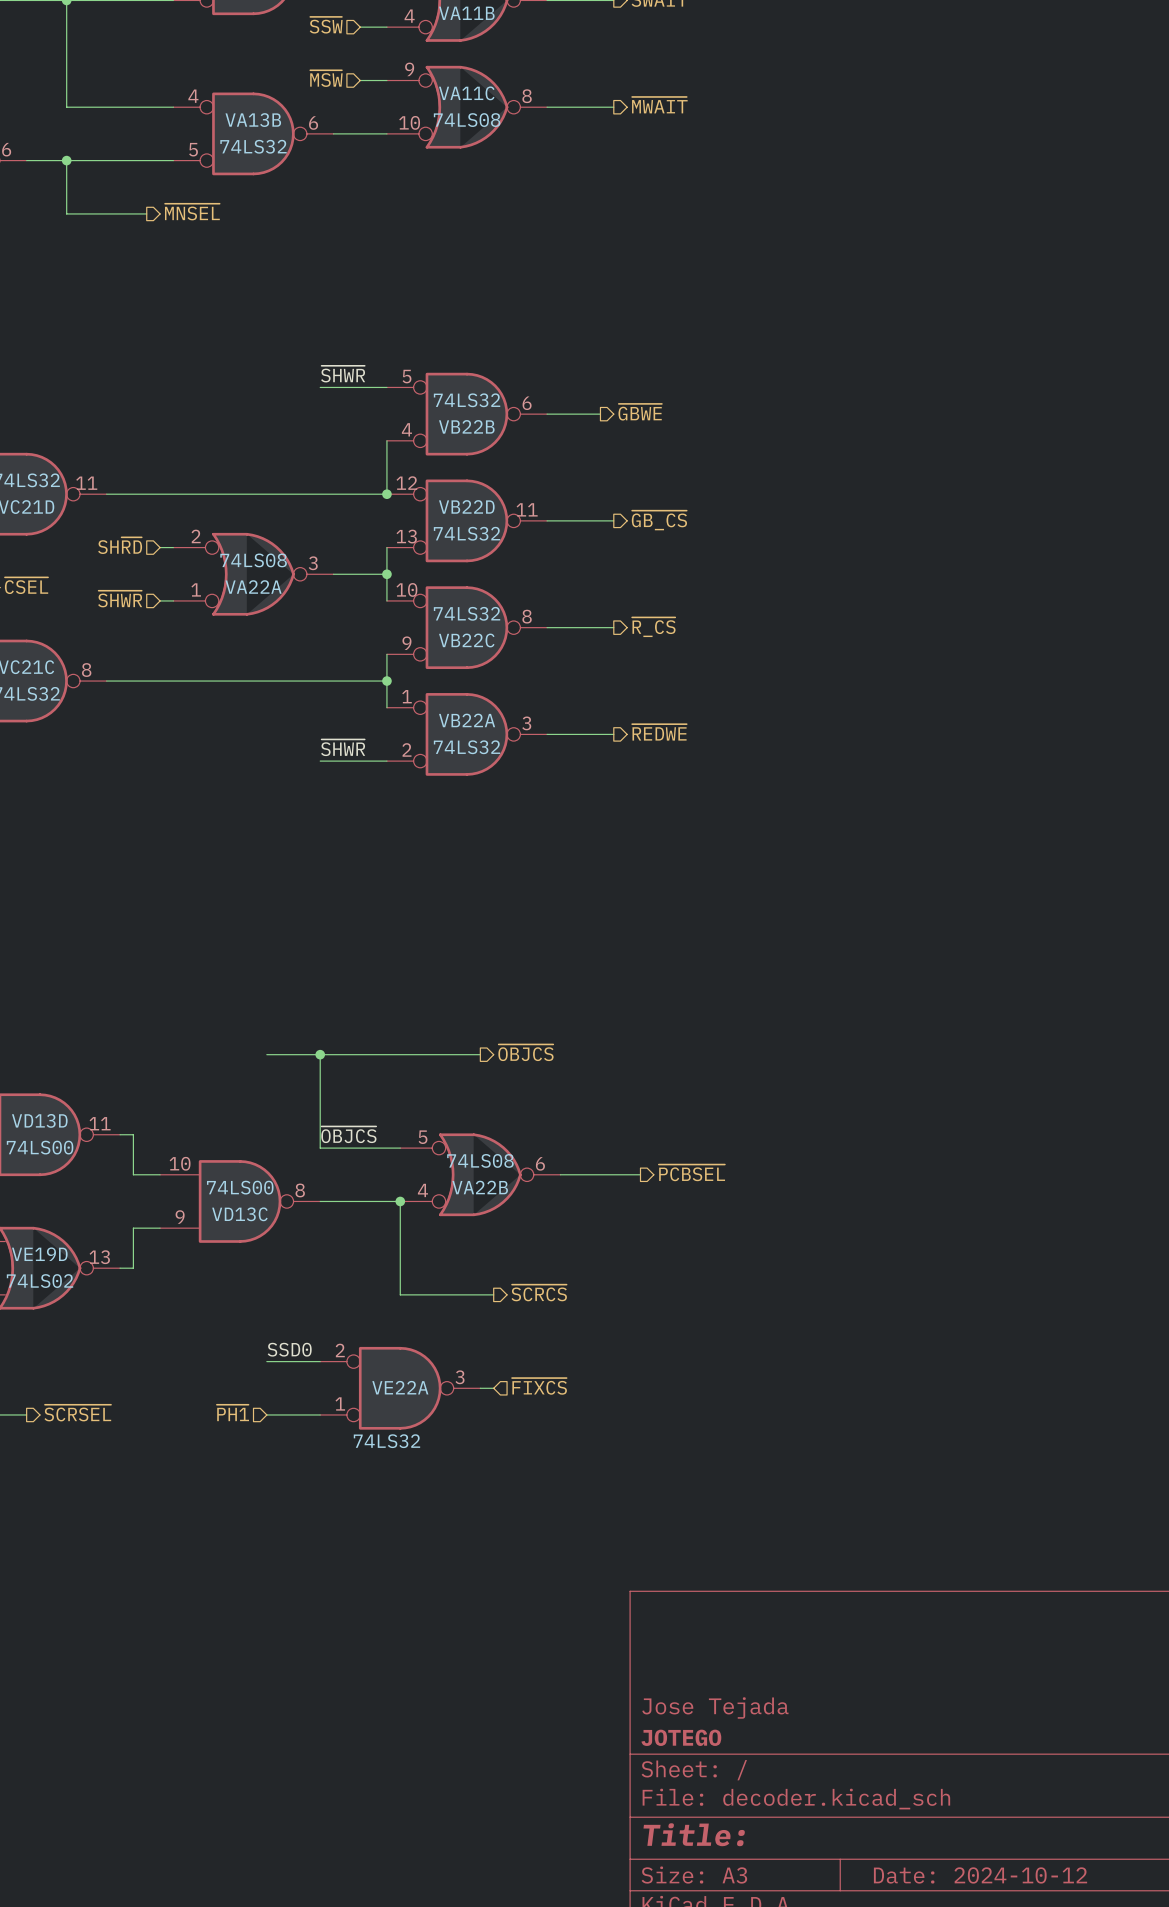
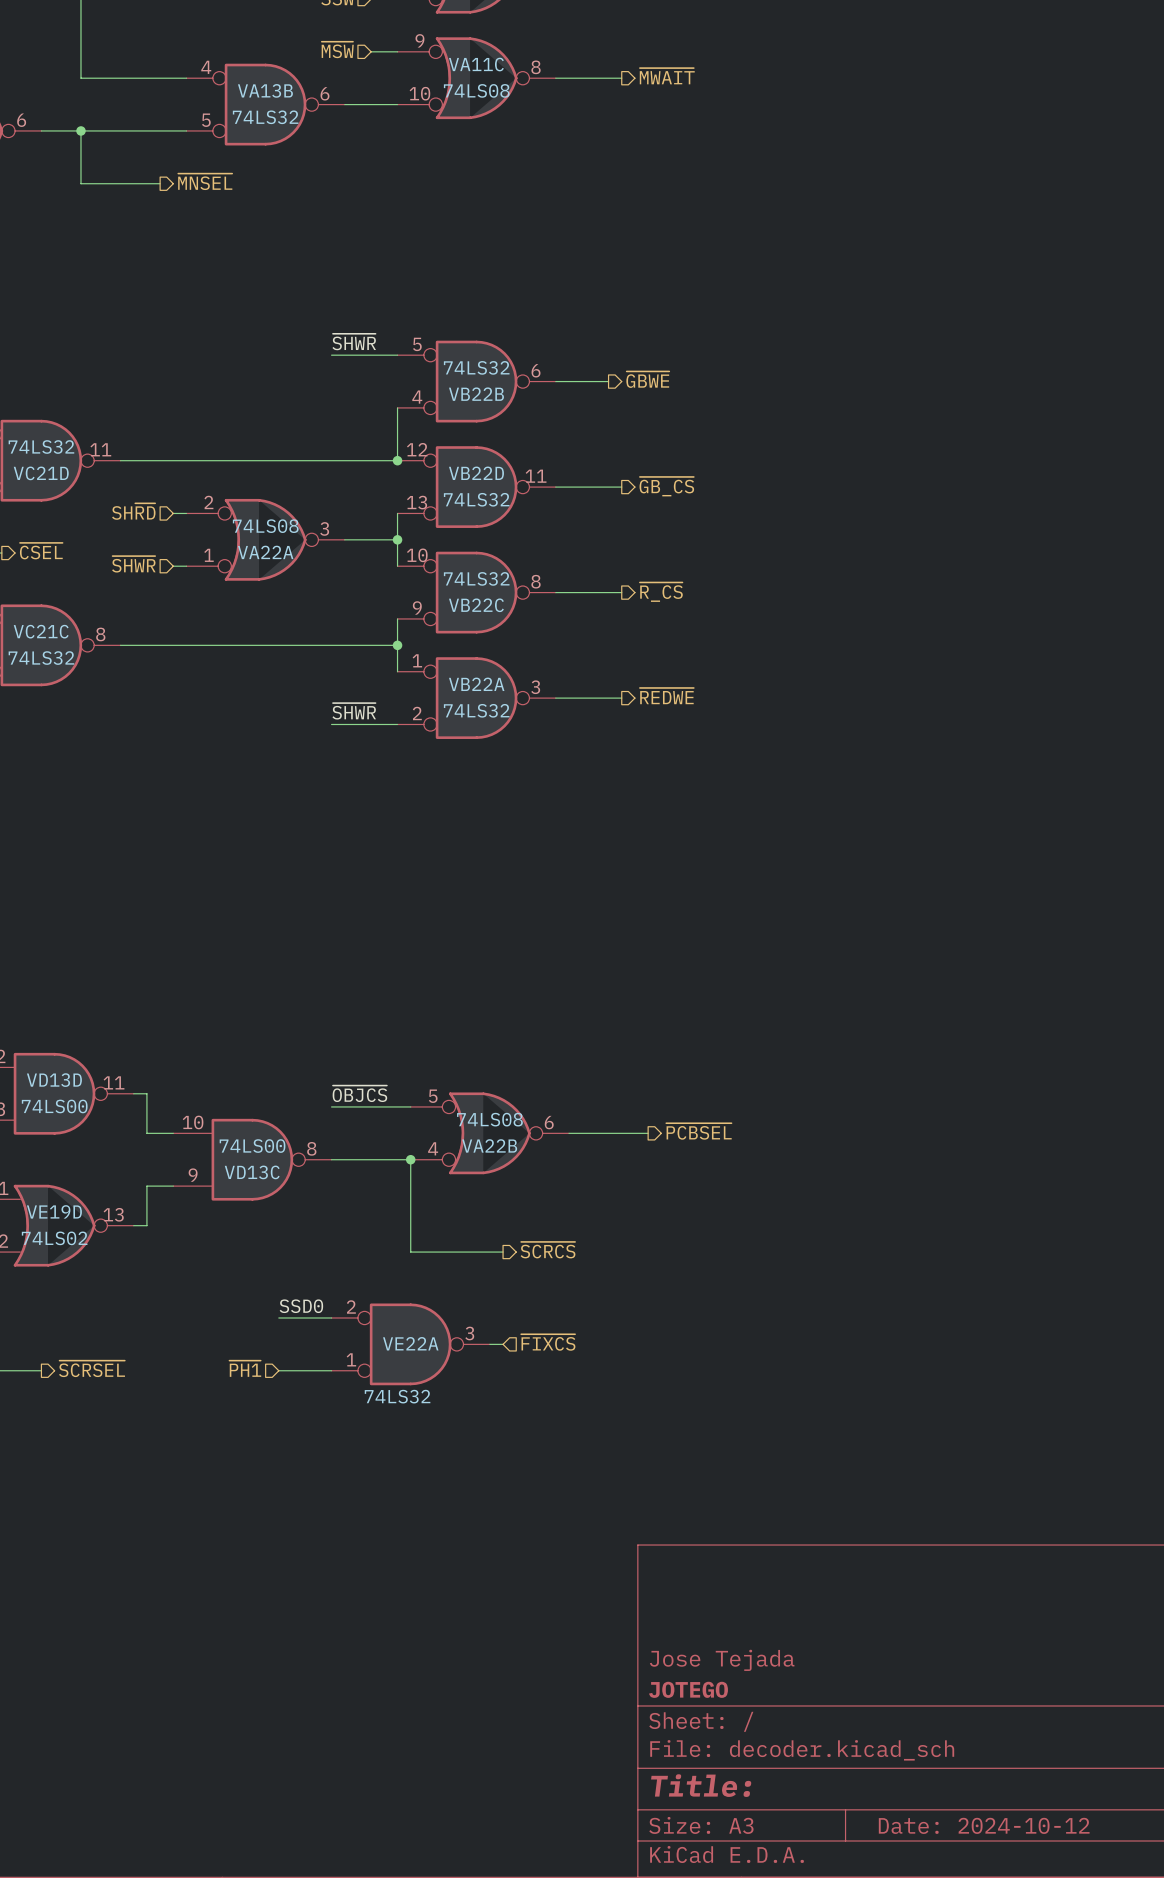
hierarchical label: ~{OBJCS} (525, 1052) -> none
wire: (266, 1054) (480, 1054) -> none
wire: (320, 1054) (320, 1148) -> none
junction: (320, 1054) -> none

